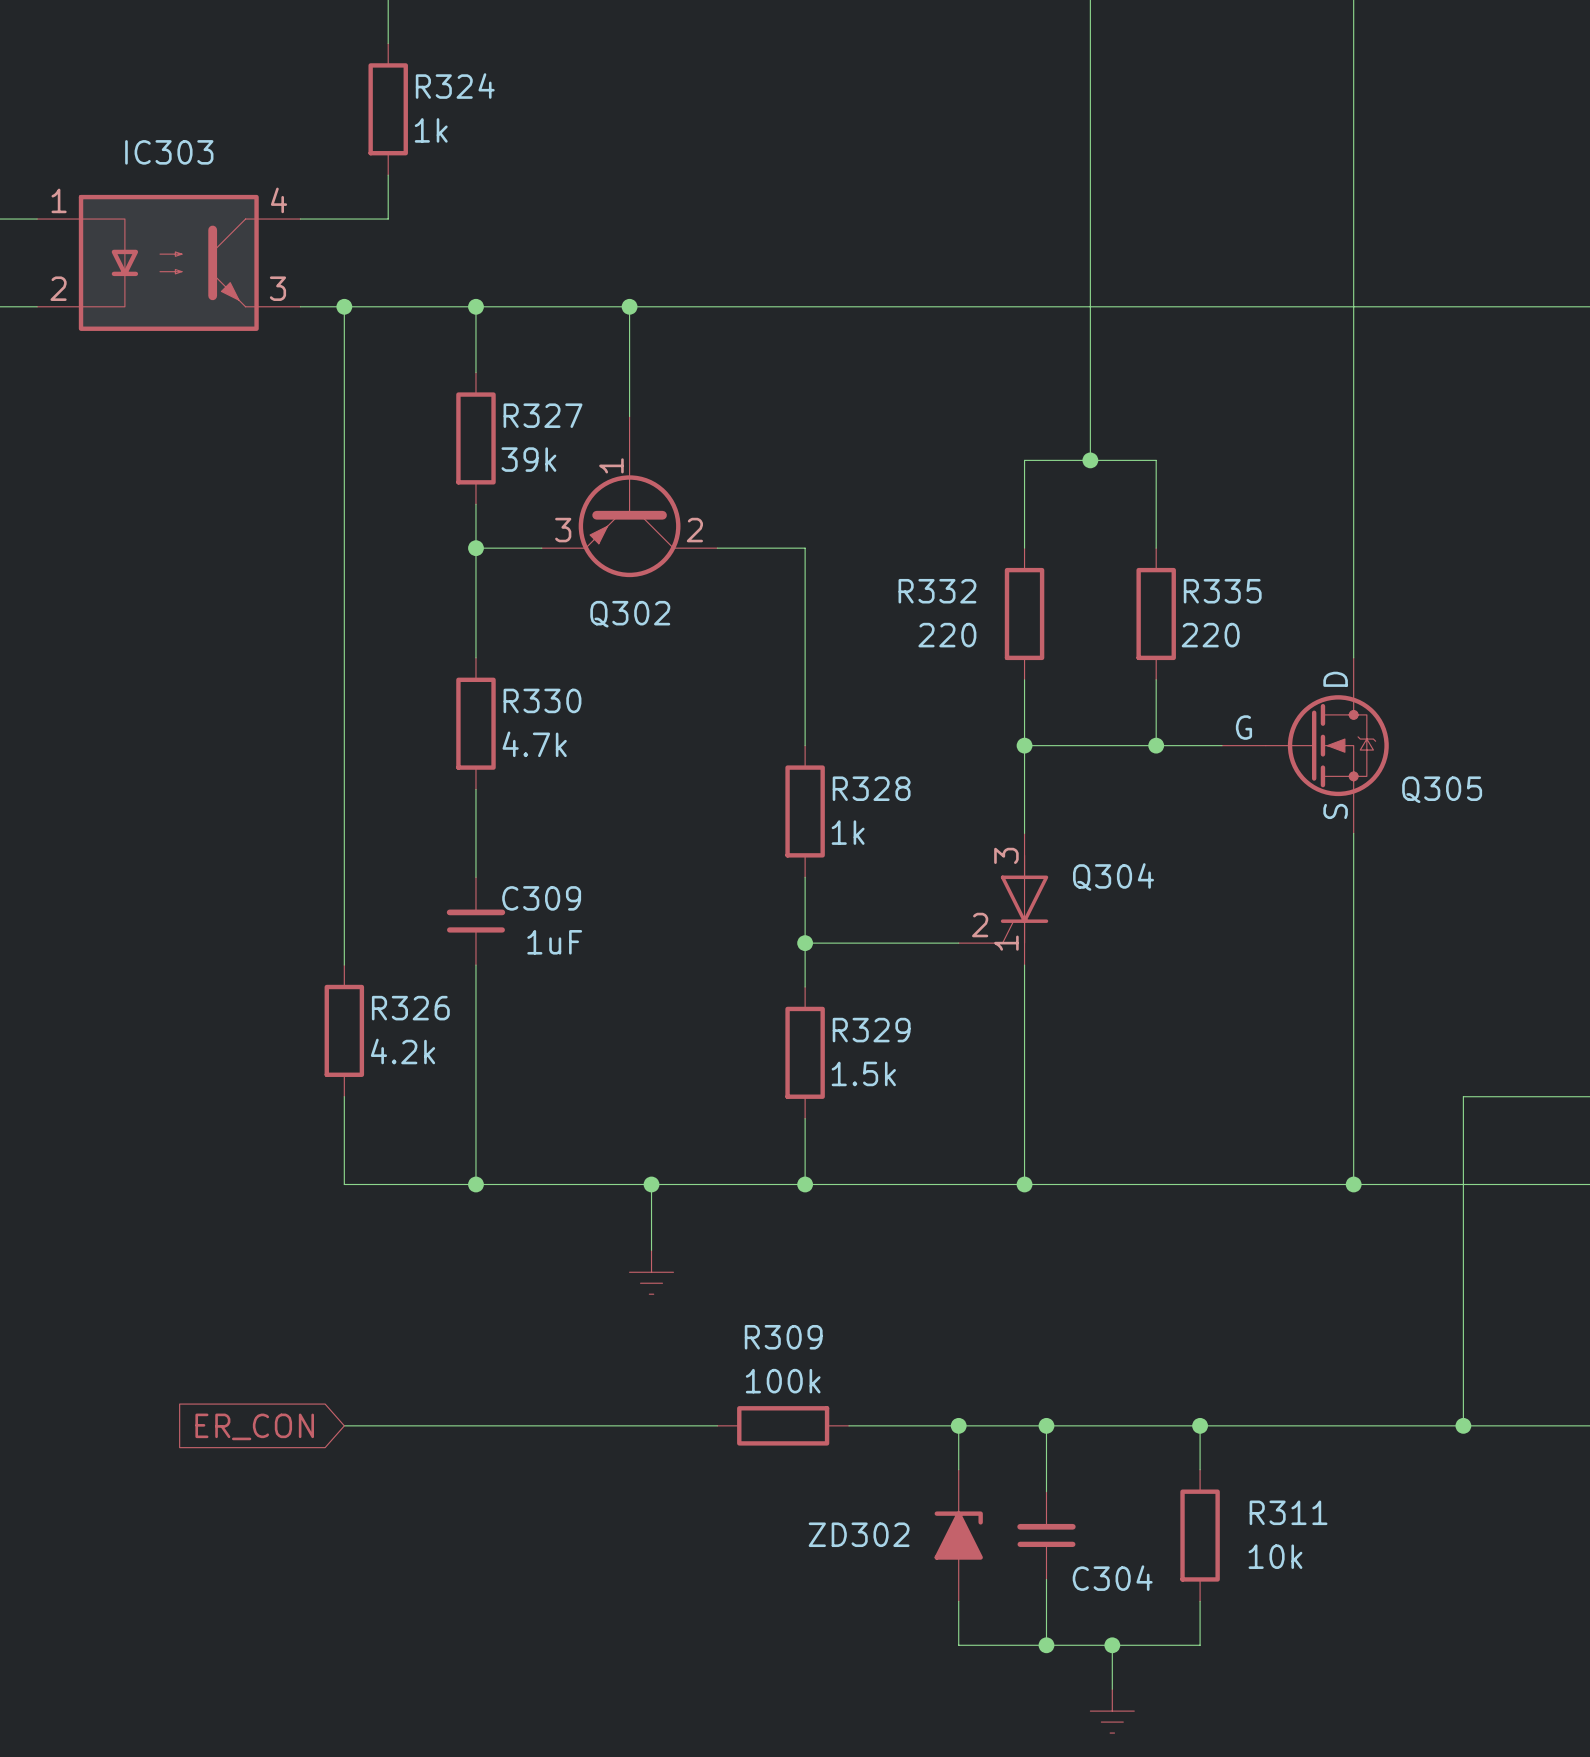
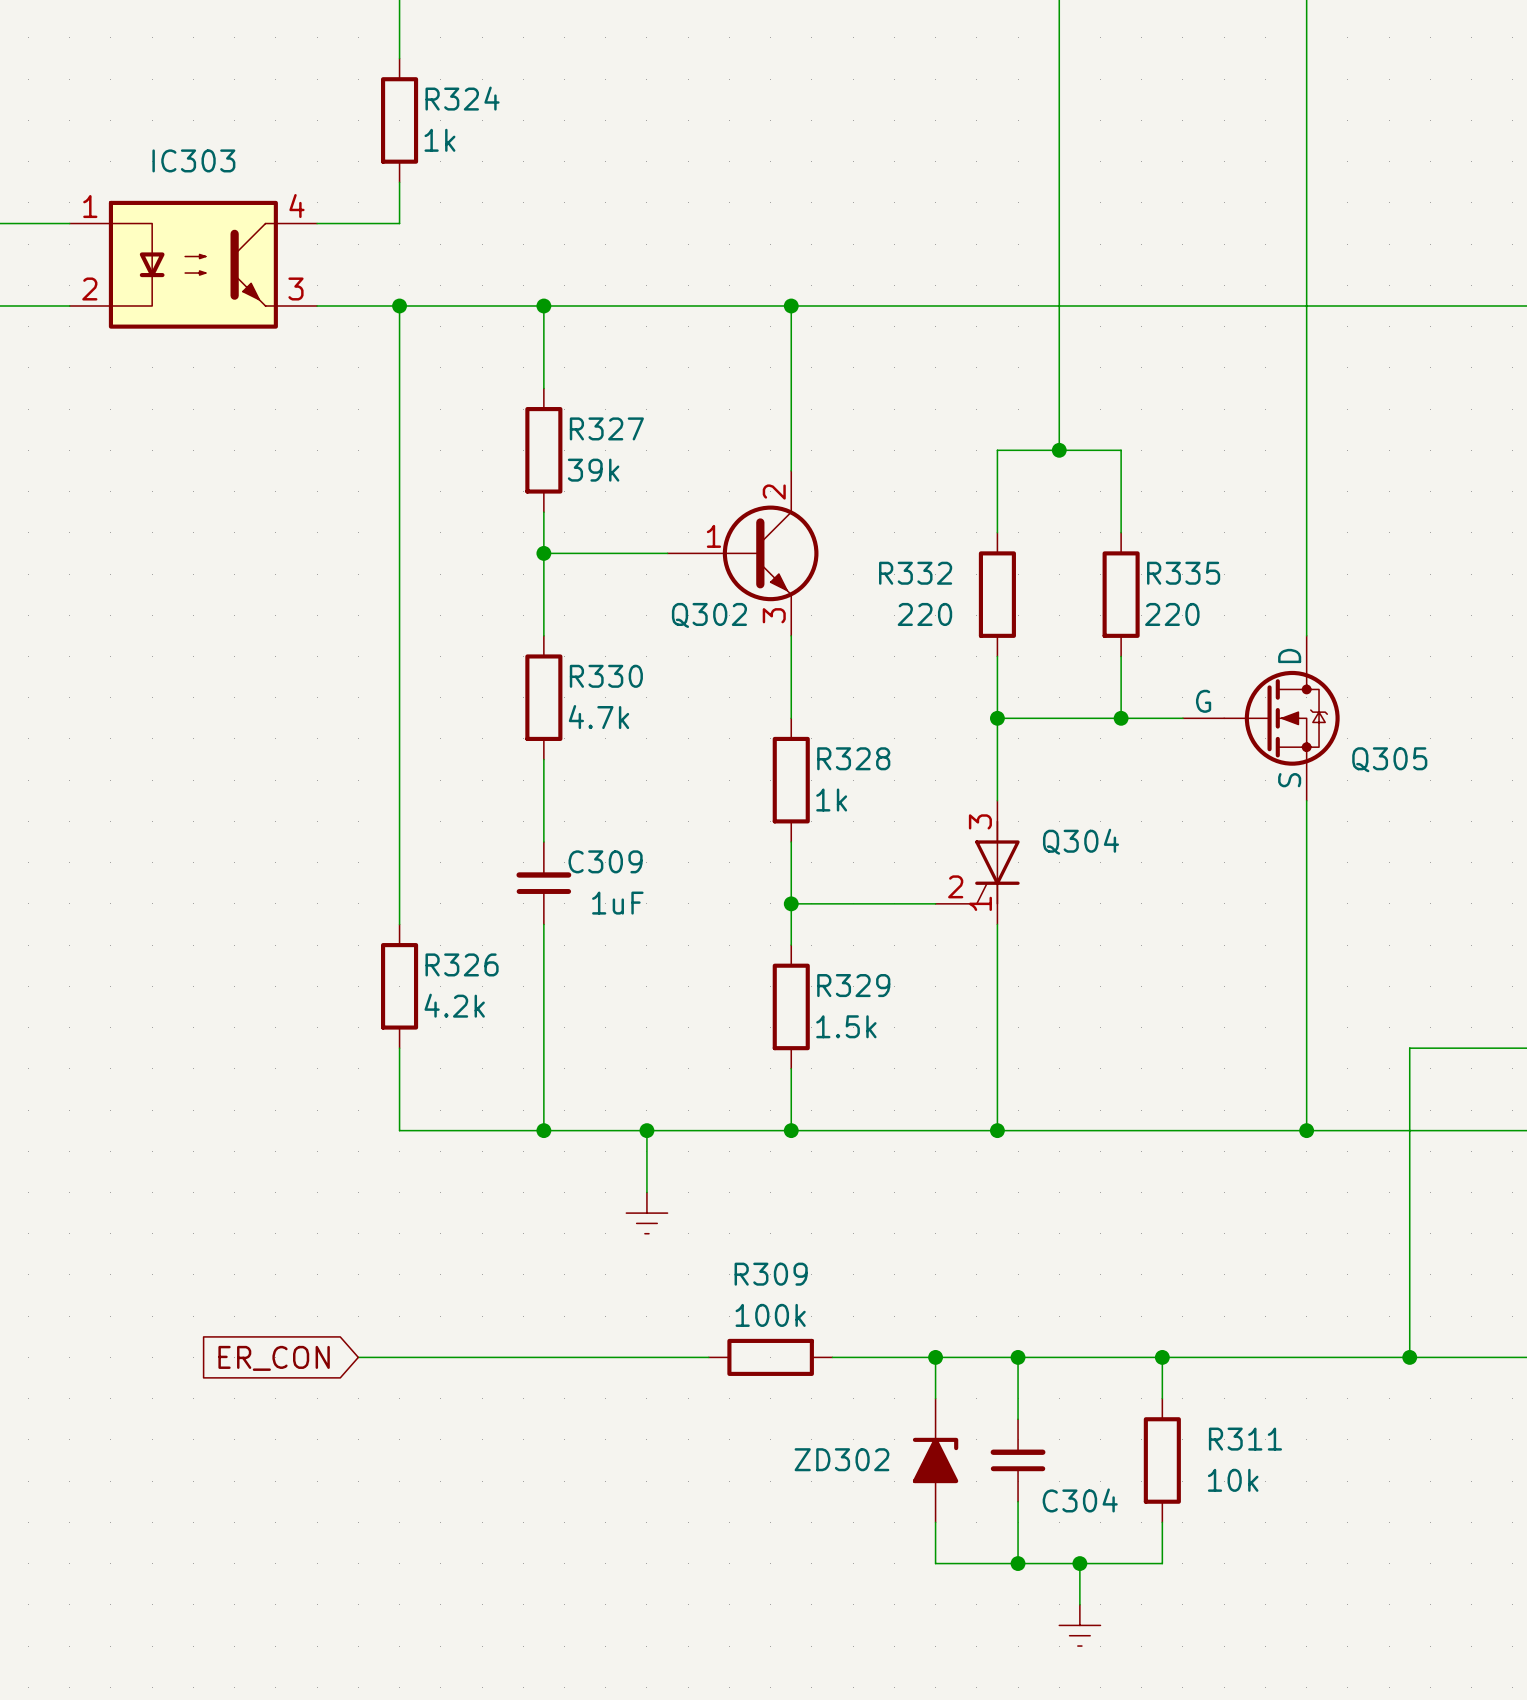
wire: (344, 306) (344, 965) -> (399, 305) (399, 924)
junction: (344, 306) -> none
junction: none -> (399, 305)
wire: (475, 306) (475, 372) -> none
junction: (475, 306) -> none
wire: none -> (543, 305) (543, 388)
junction: none -> (543, 305)
wire: (629, 306) (629, 416) -> none
junction: (629, 306) -> none
wire: none -> (791, 305) (791, 470)
junction: none -> (791, 305)
Q302 symbol: [541, 416, 718, 578] -> [667, 470, 819, 636]
R327 position: (475, 438) -> (543, 450)
wire: (475, 504) (475, 657) -> none
wire: none -> (543, 512) (543, 635)
wire: (475, 548) (541, 548) -> none
junction position: (475, 548) -> (543, 553)
wire: (717, 548) (805, 548) (805, 657) -> none
wire: none -> (543, 553) (667, 553)
Q302 name position: Q302 (630, 614) -> Q302 (709, 615)
R330 position: (475, 723) -> (543, 697)
wire: (475, 789) (475, 877) -> (543, 759) (543, 842)
C309 position: (475, 921) -> (543, 883)
wire: (475, 965) (475, 1184) -> (543, 924) (543, 1130)
R326 position: (344, 1030) -> (399, 986)
wire: (344, 1096) (344, 1184) (388, 1184) -> (399, 1048) (399, 1130)
junction position: (475, 1184) -> (543, 1130)

